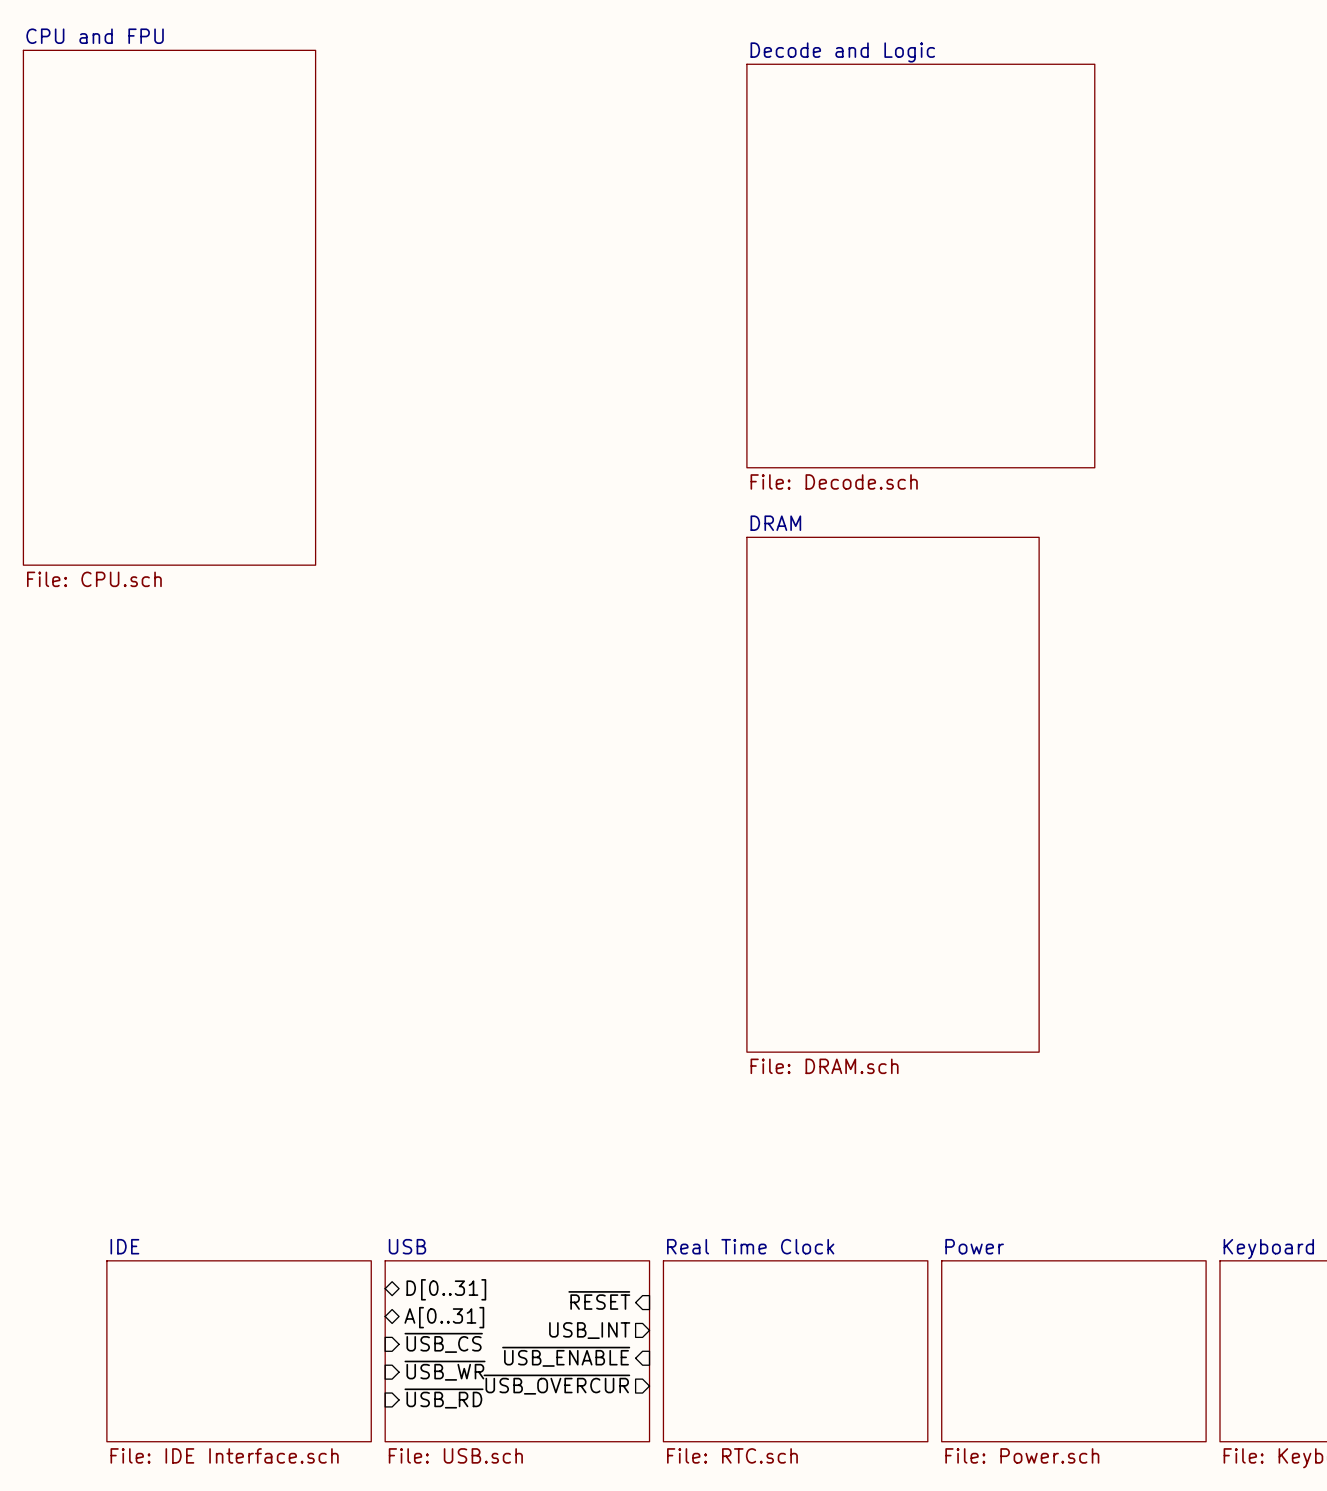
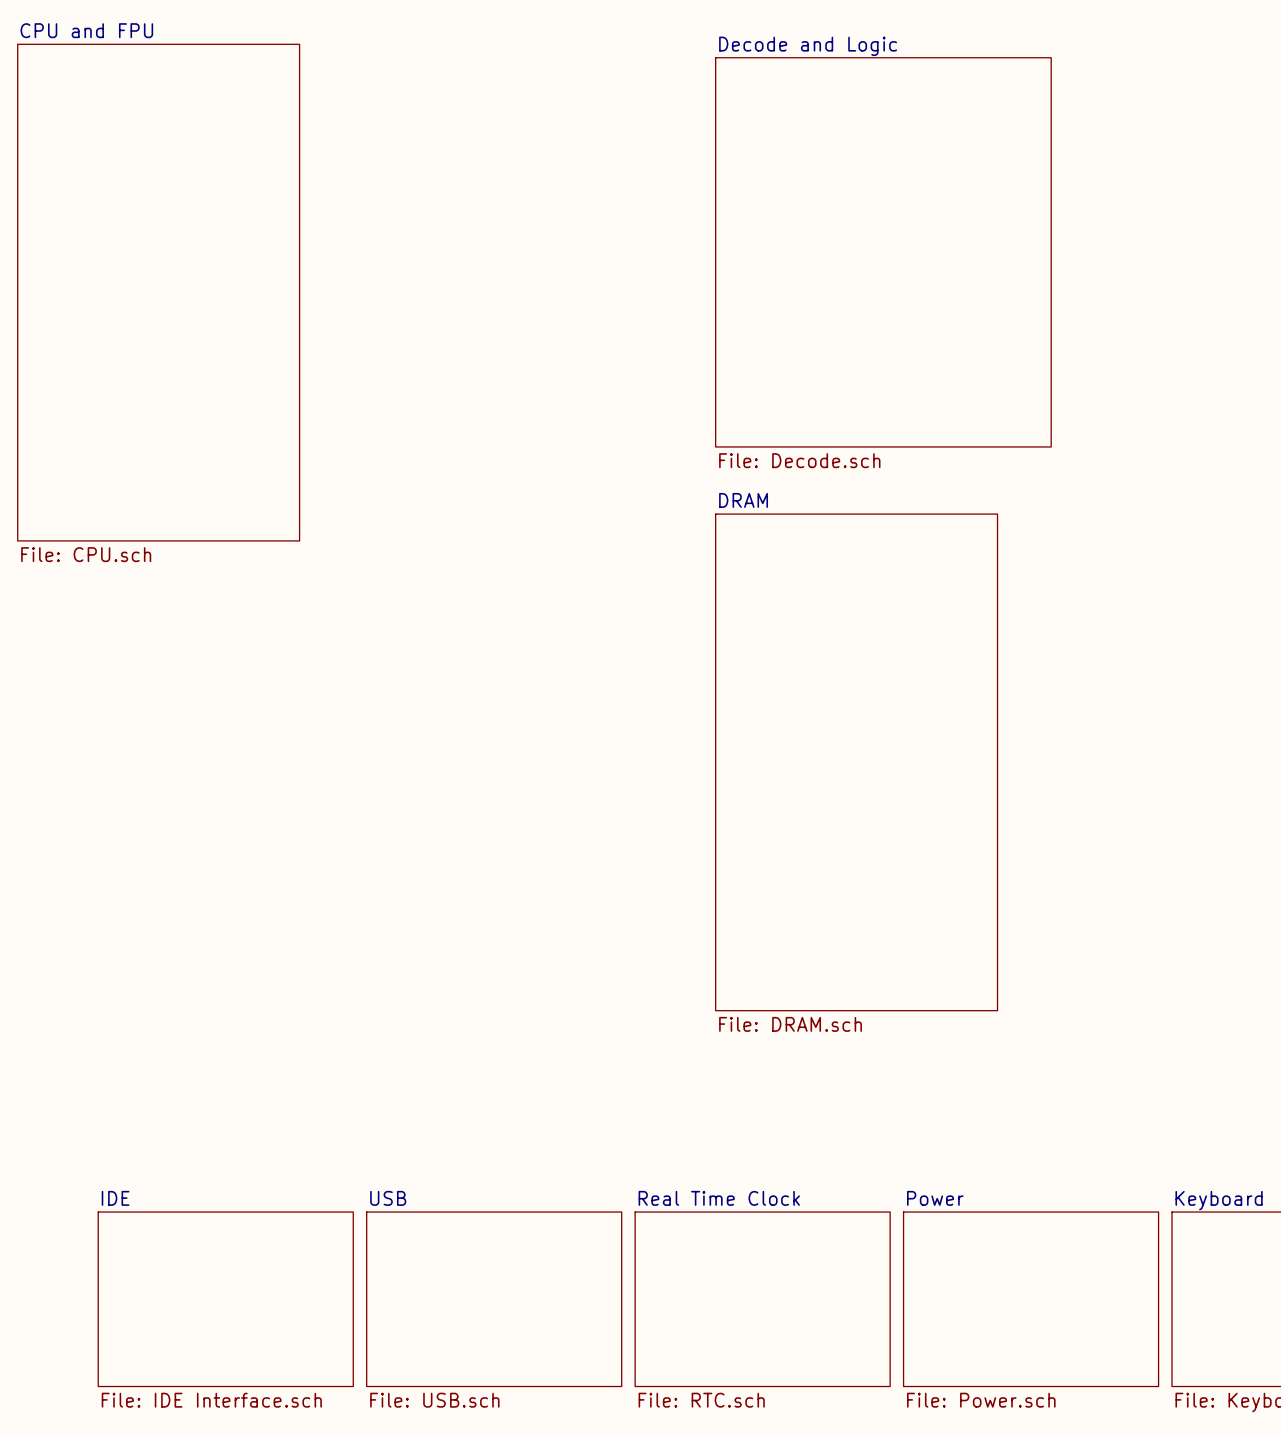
sheet pin: D[0..31] (446, 1289) -> none
sheet pin: ~{RESET} (599, 1300) -> none
sheet pin: A[0..31] (444, 1317) -> none
sheet pin: USB_INT (589, 1330) -> none
sheet pin: ~{USB_CS} (443, 1342) -> none
sheet pin: ~{USB_ENABLE} (566, 1356) -> none
sheet pin: ~{USB_WR} (445, 1370) -> none
sheet pin: ~{USB_OVERCUR} (556, 1384) -> none
sheet pin: ~{USB_RD} (444, 1398) -> none

